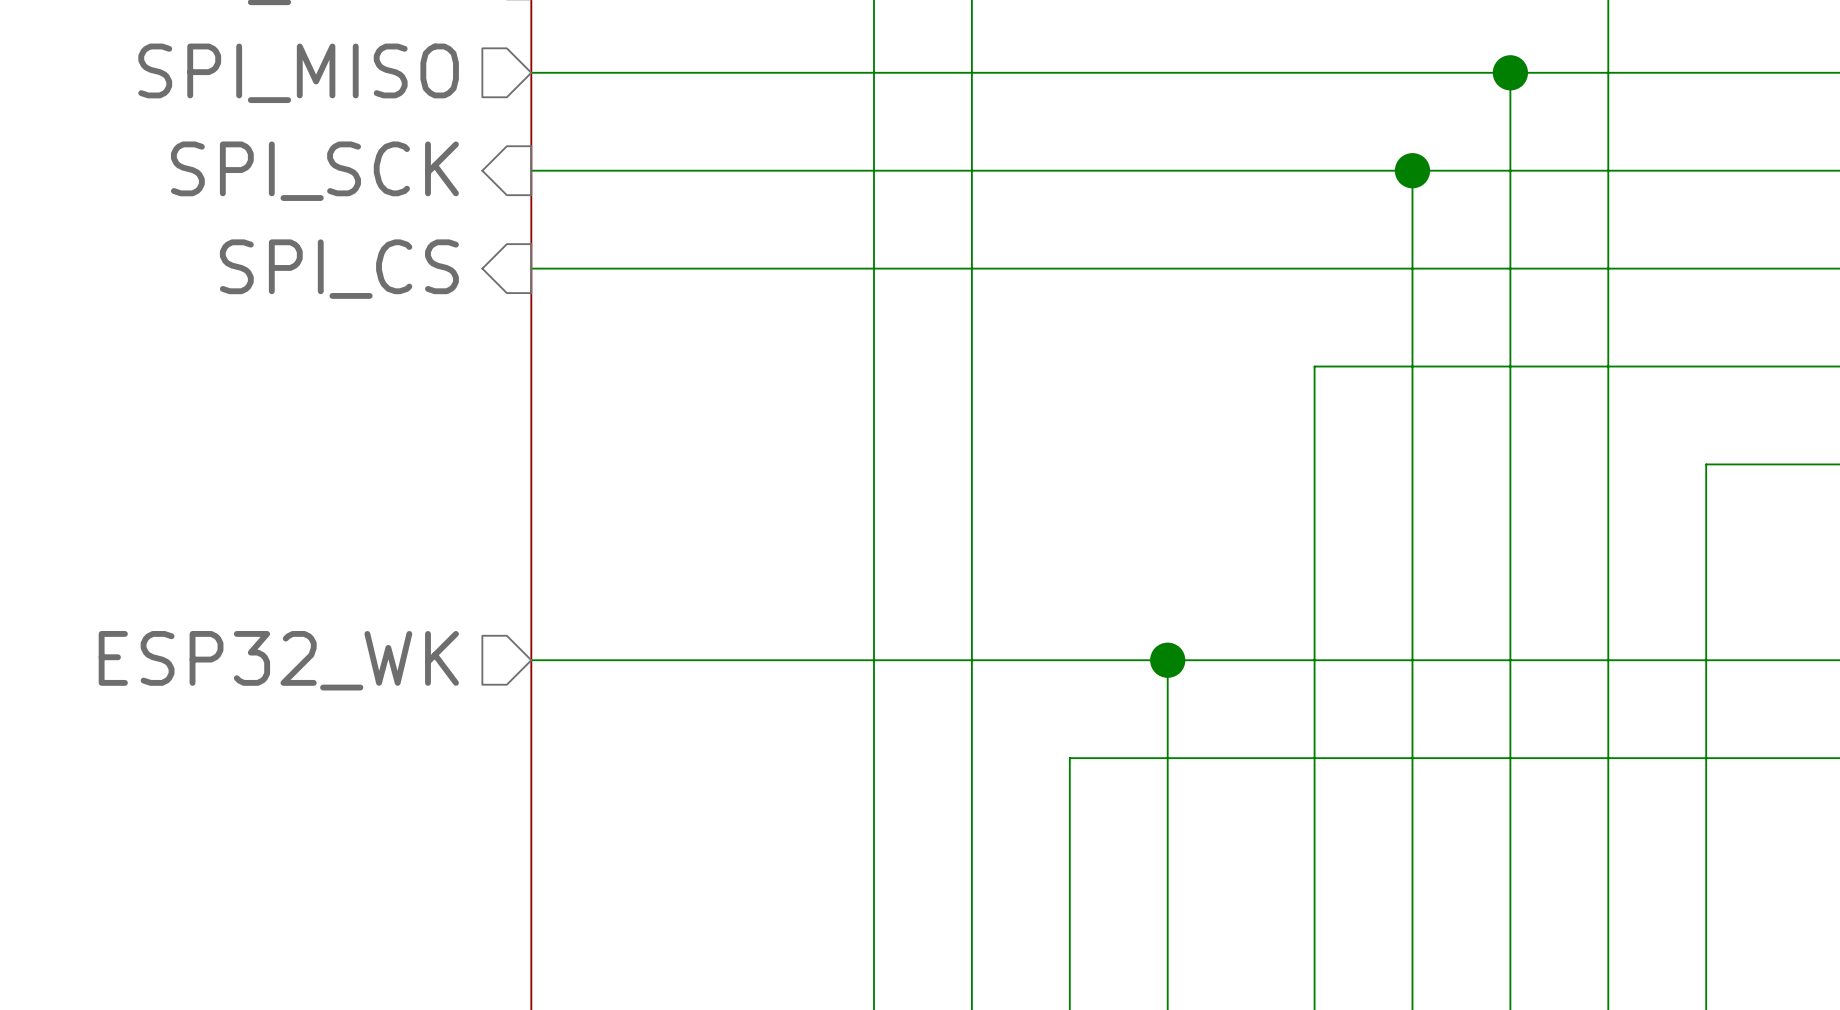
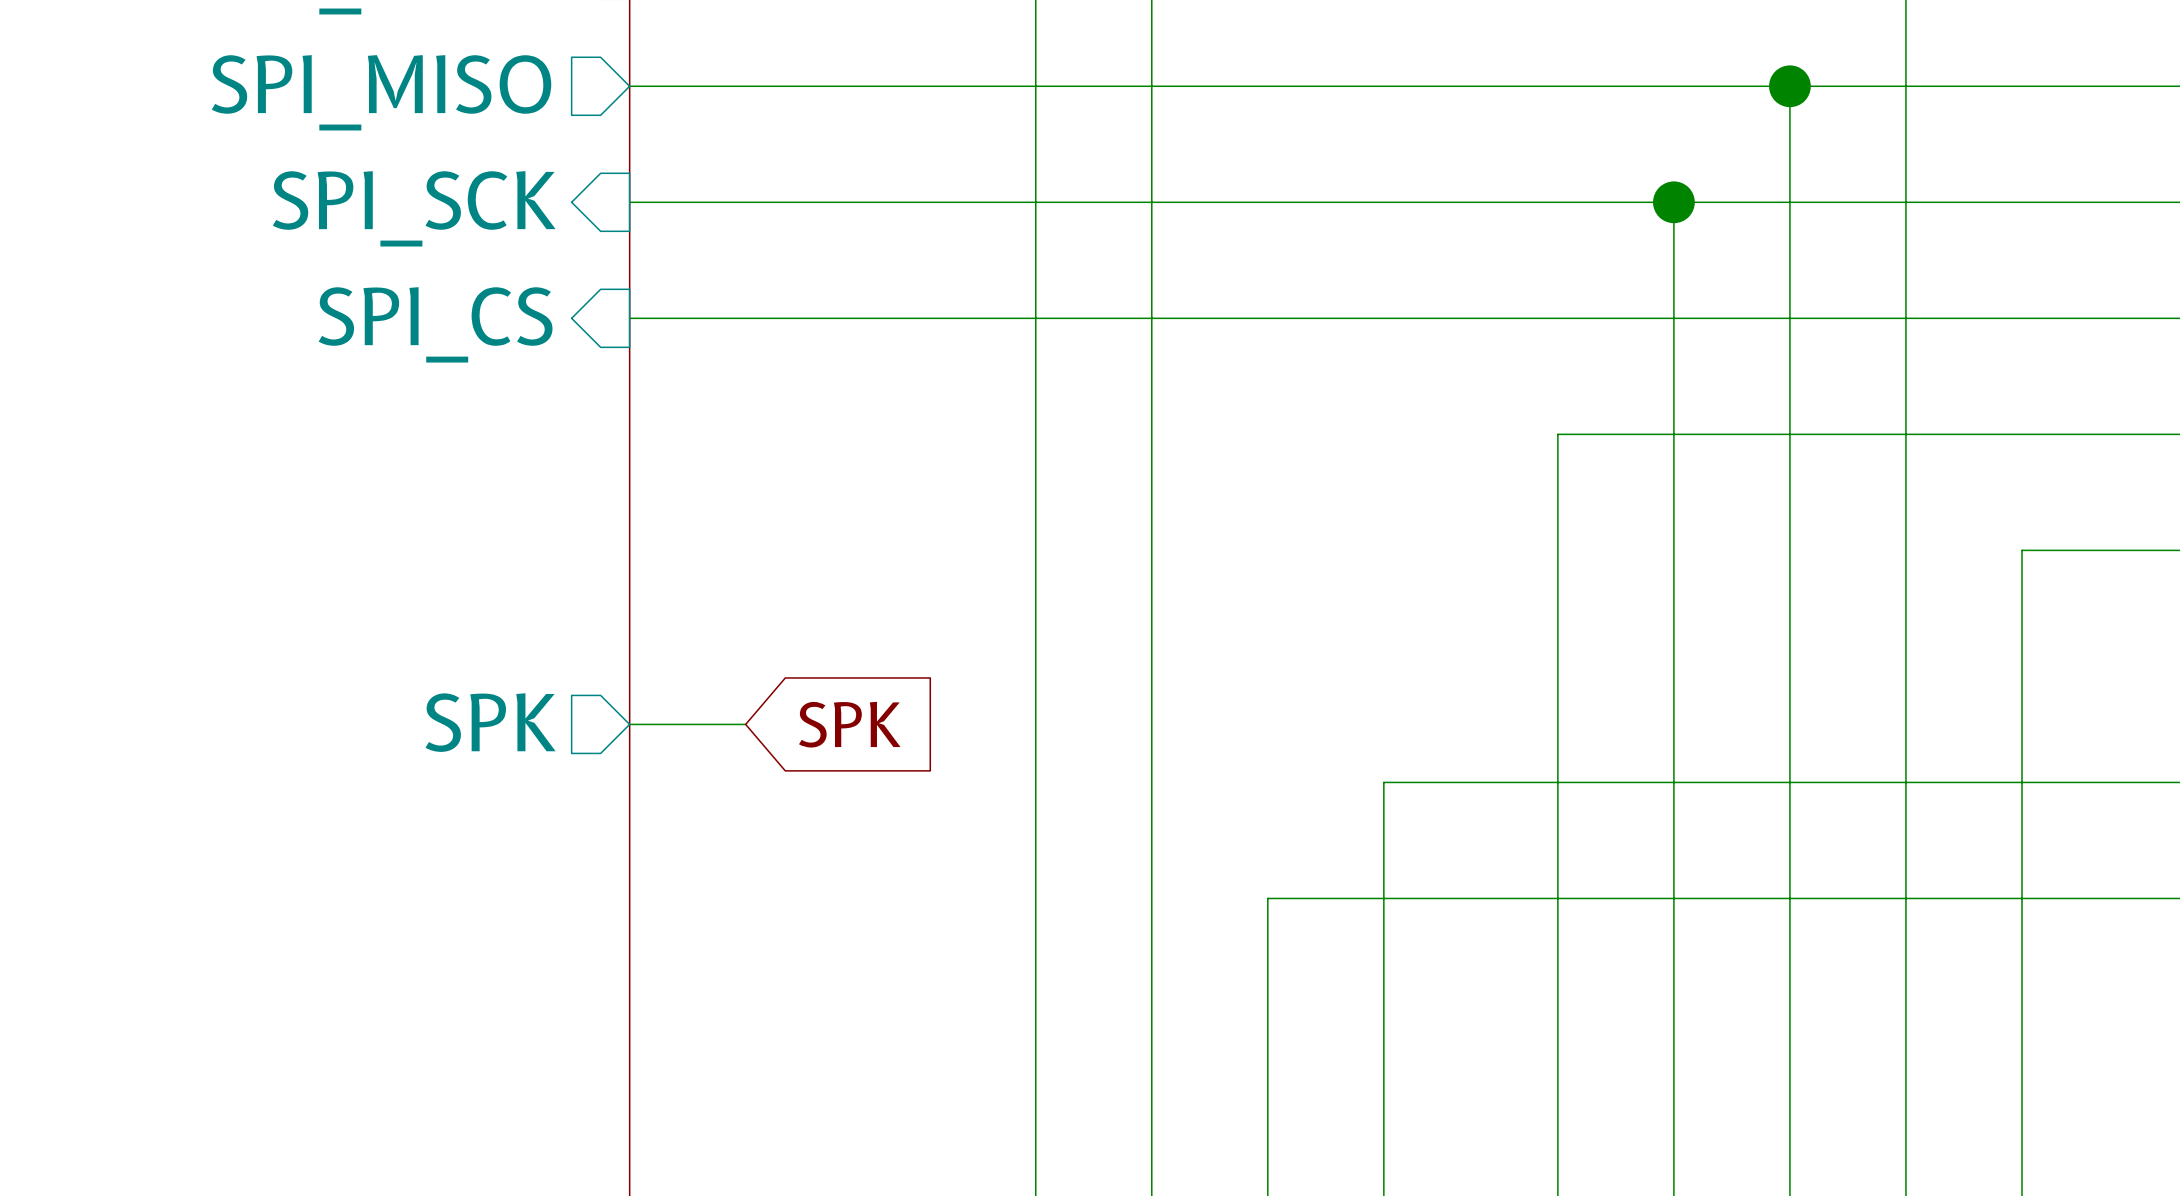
sheet pin: none -> SPK (490, 722)
wire: none -> (629, 724) (745, 724)
global label: none -> SPK (849, 724)
sheet pin: ESP32_WK (278, 660) -> none
wire: (531, 660) (1167, 660) -> none
junction: (1167, 660) -> none

